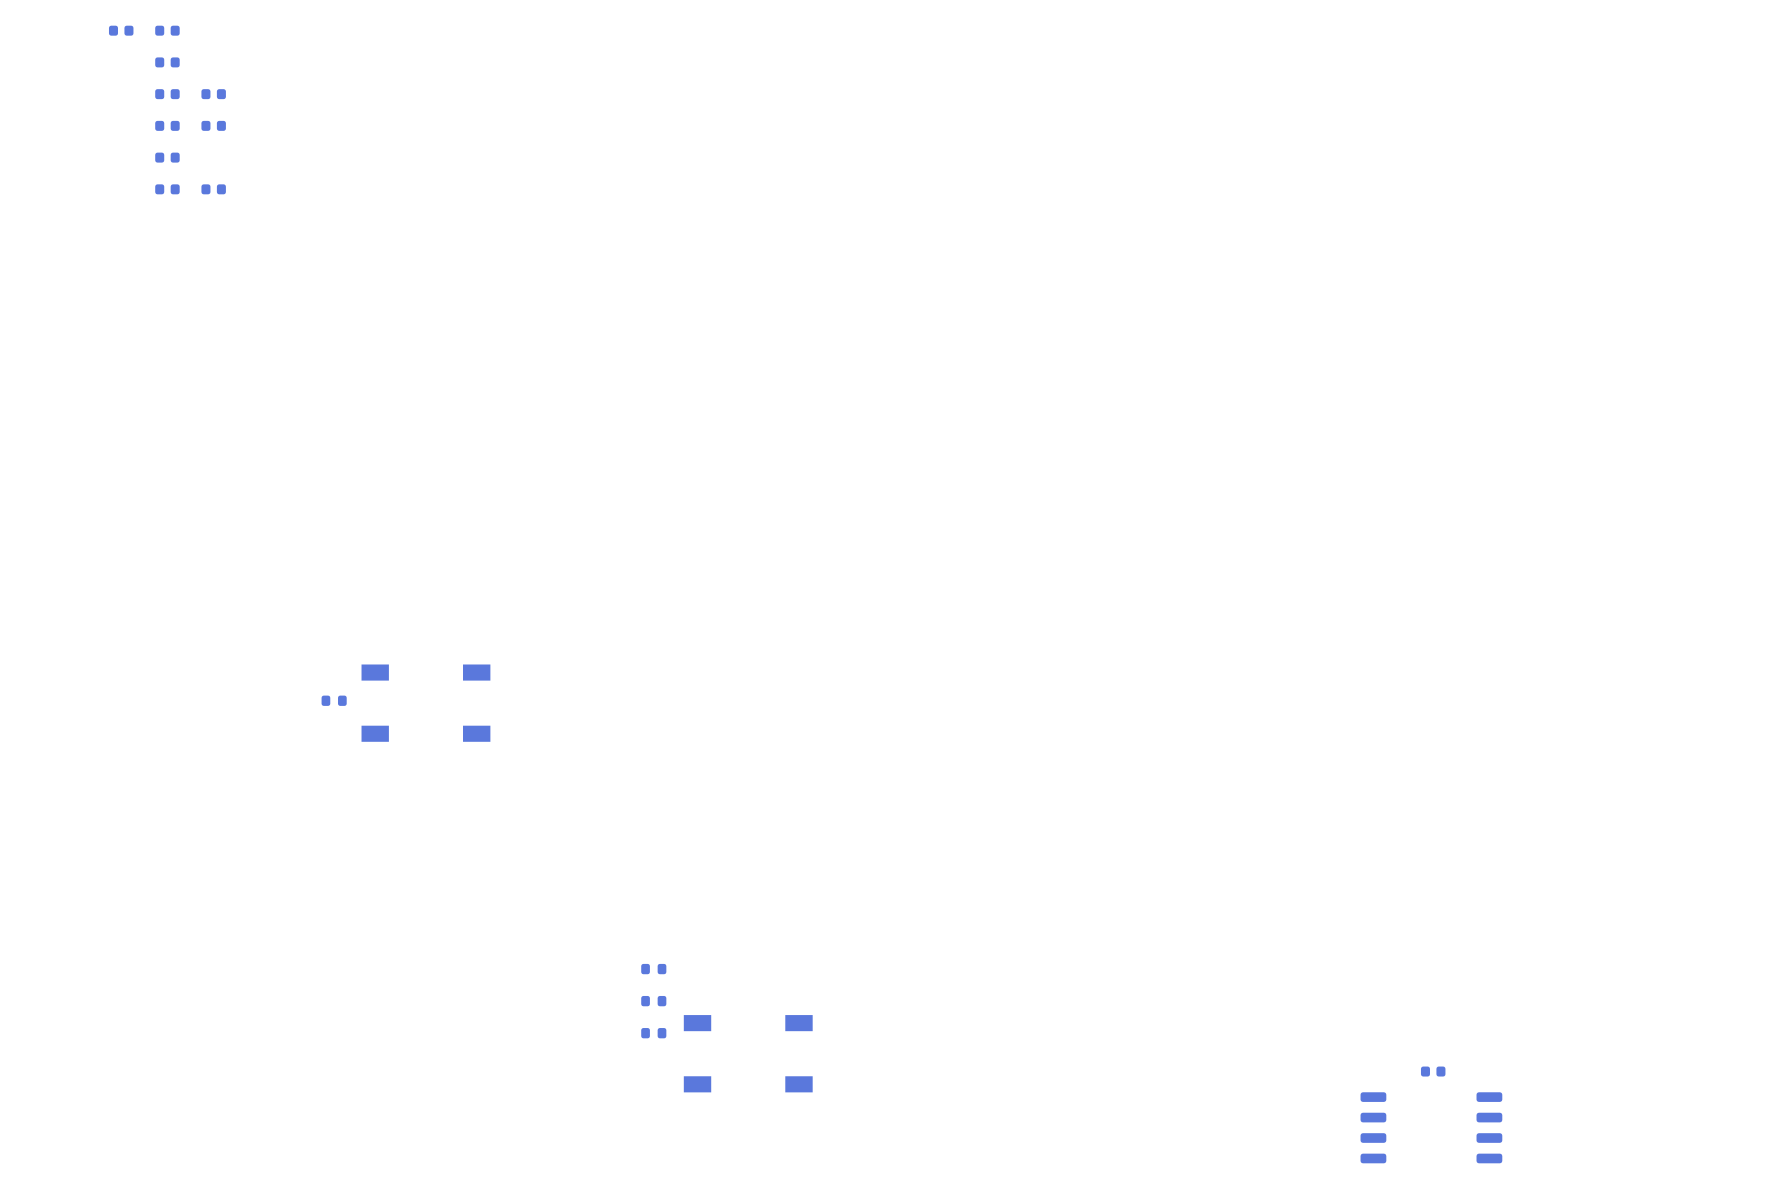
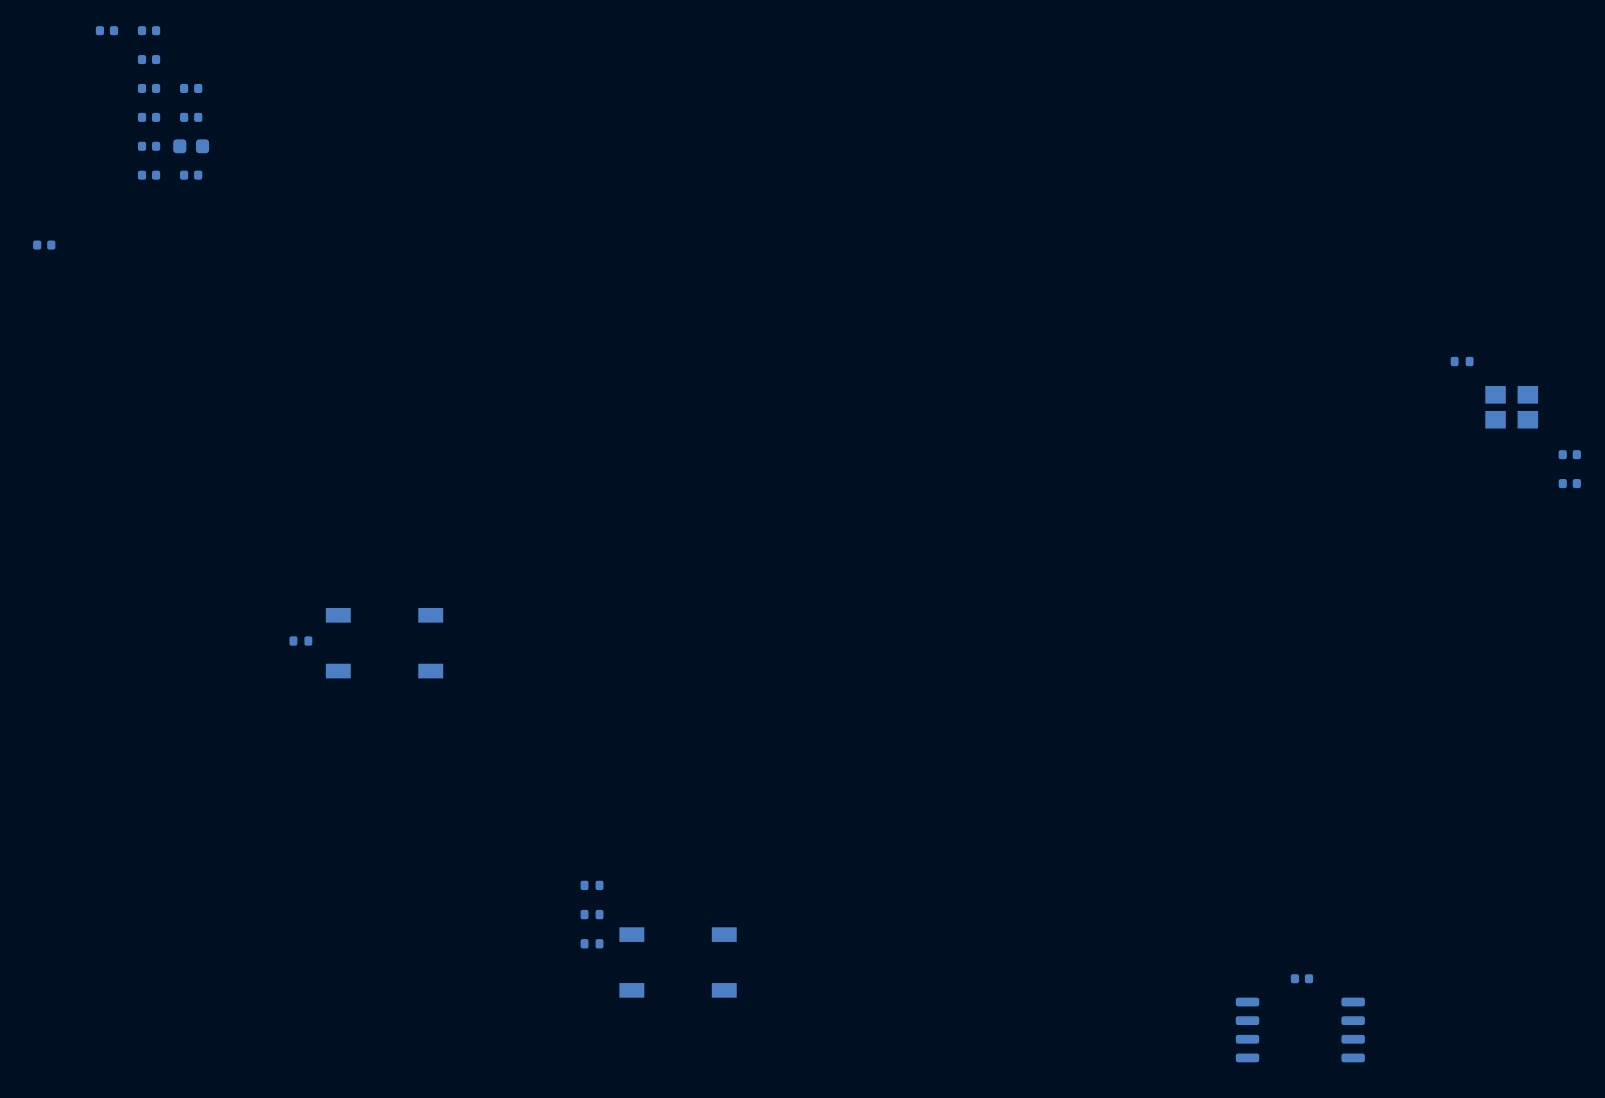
part: none -> (191, 146)
part: none -> (44, 245)
part: none -> (1462, 361)
part: none -> (1511, 407)
part: none -> (1569, 454)
part: none -> (1569, 483)

